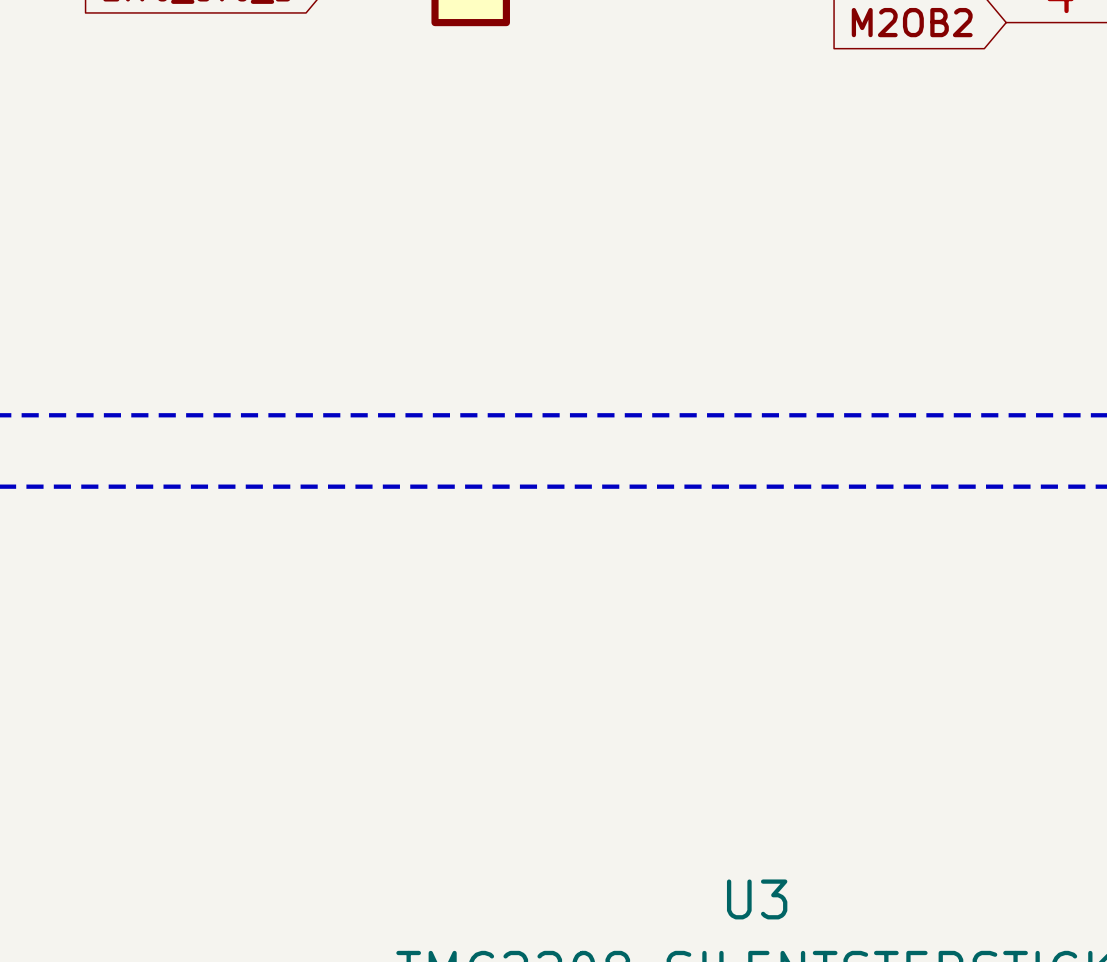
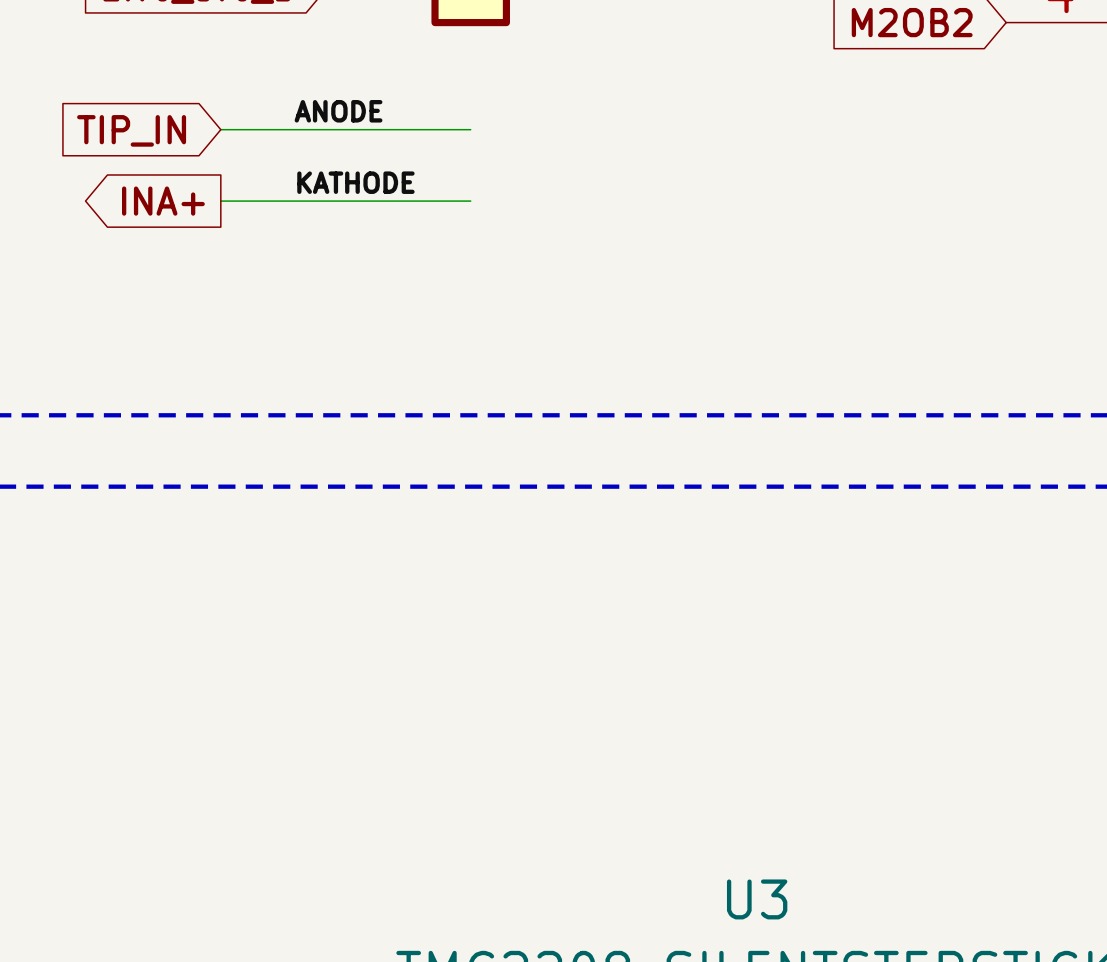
label: none -> ANODE (338, 111)
wire: none -> (220, 129) (470, 129)
global label: none -> TIP_IN (131, 130)
label: none -> KATHODE (355, 182)
global label: none -> INA+ (163, 201)
wire: none -> (220, 201) (470, 201)

